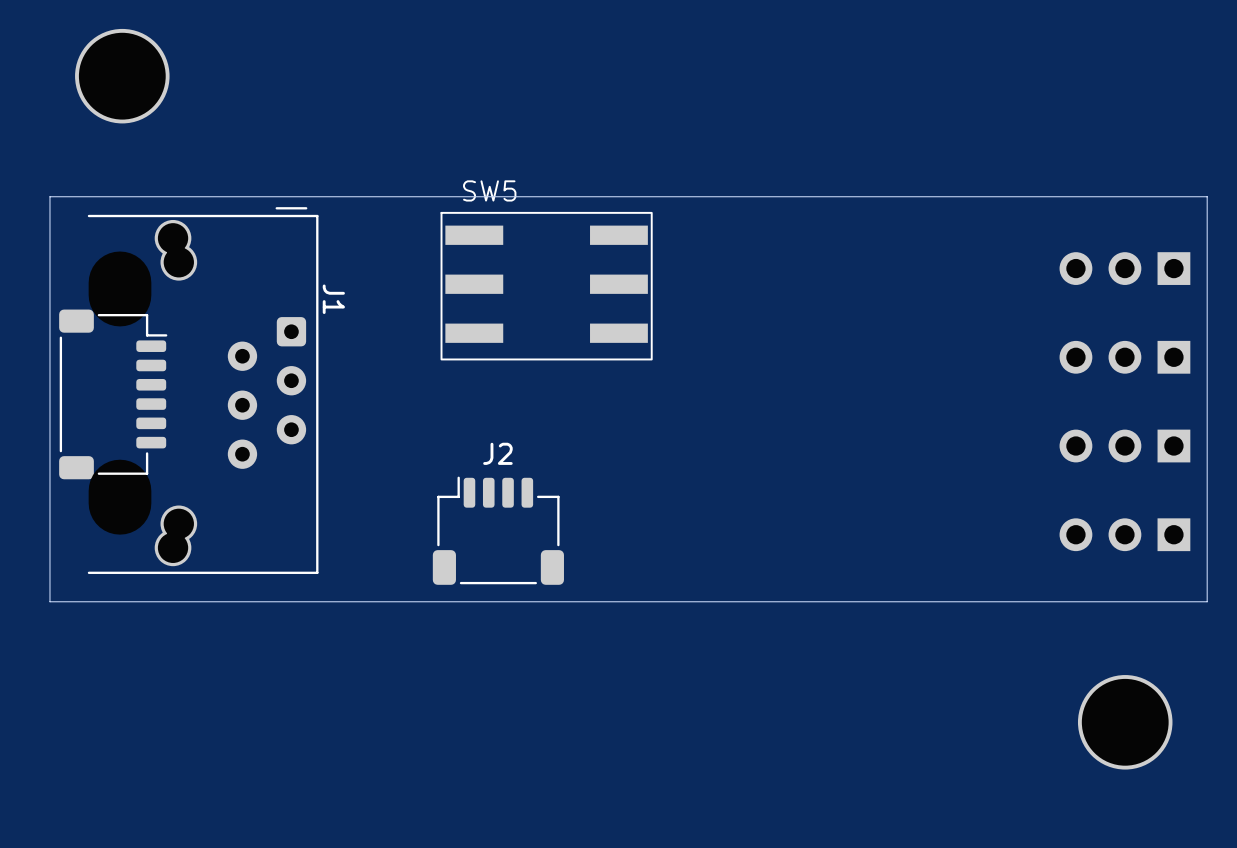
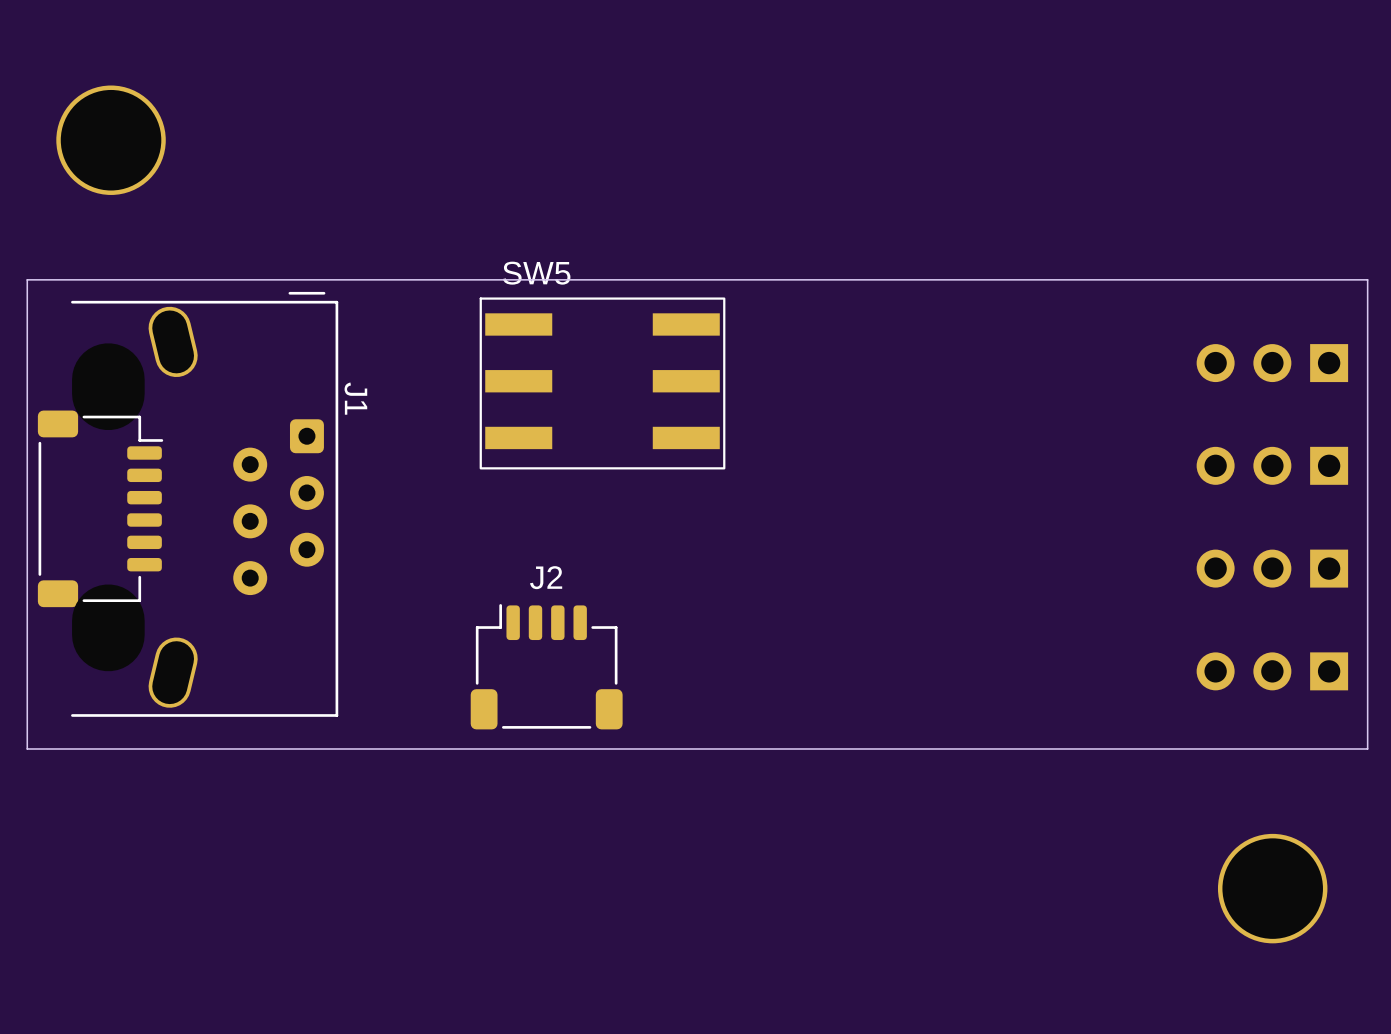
J1 footprint: [87, 207, 319, 574] -> [71, 291, 339, 717]

